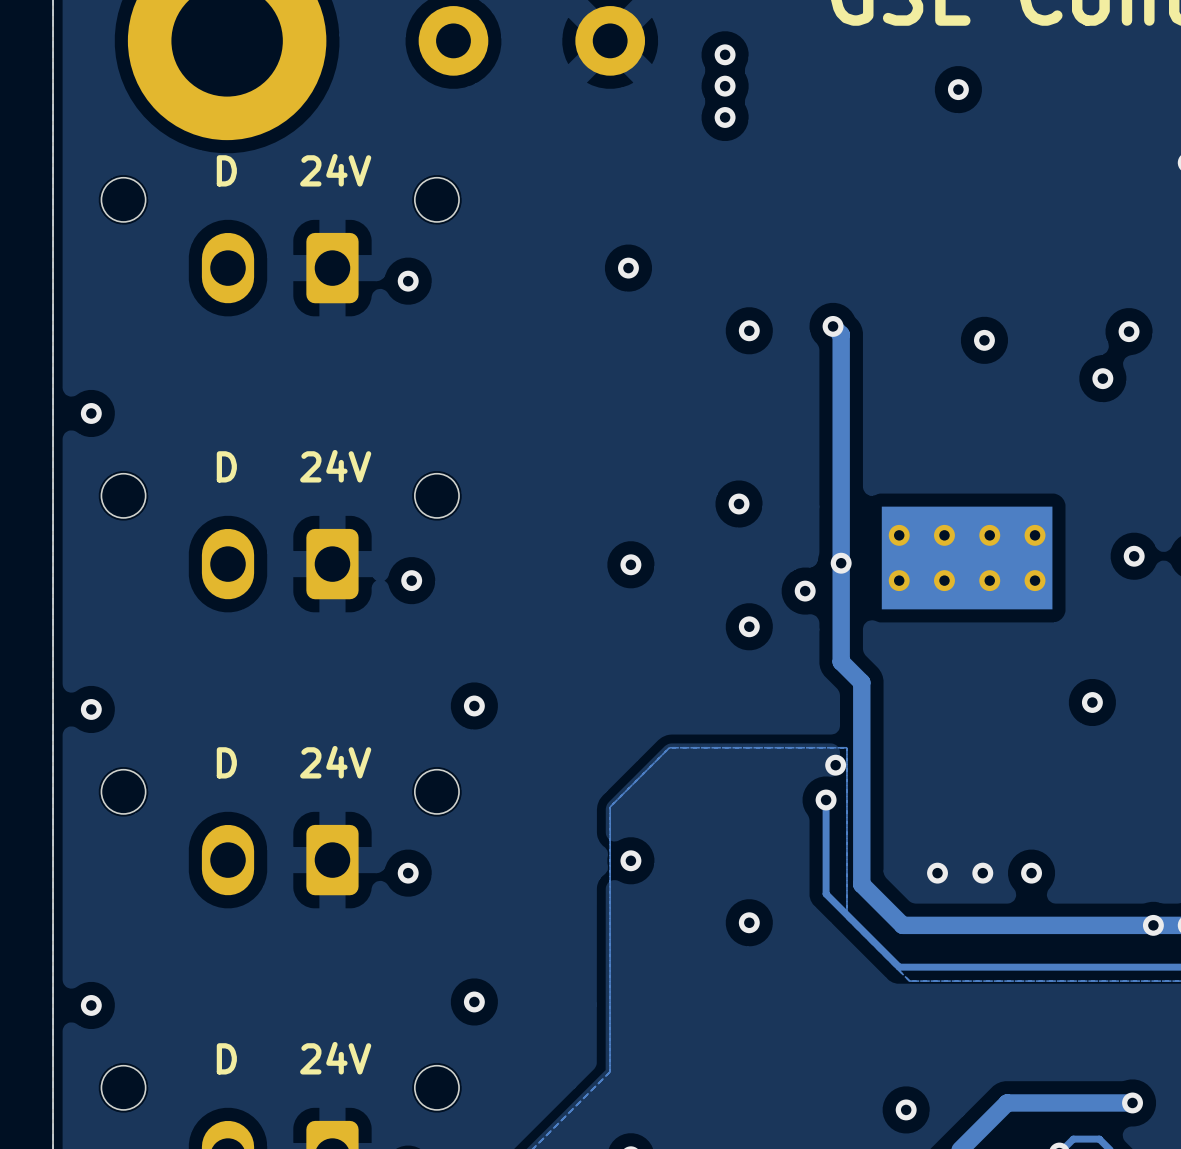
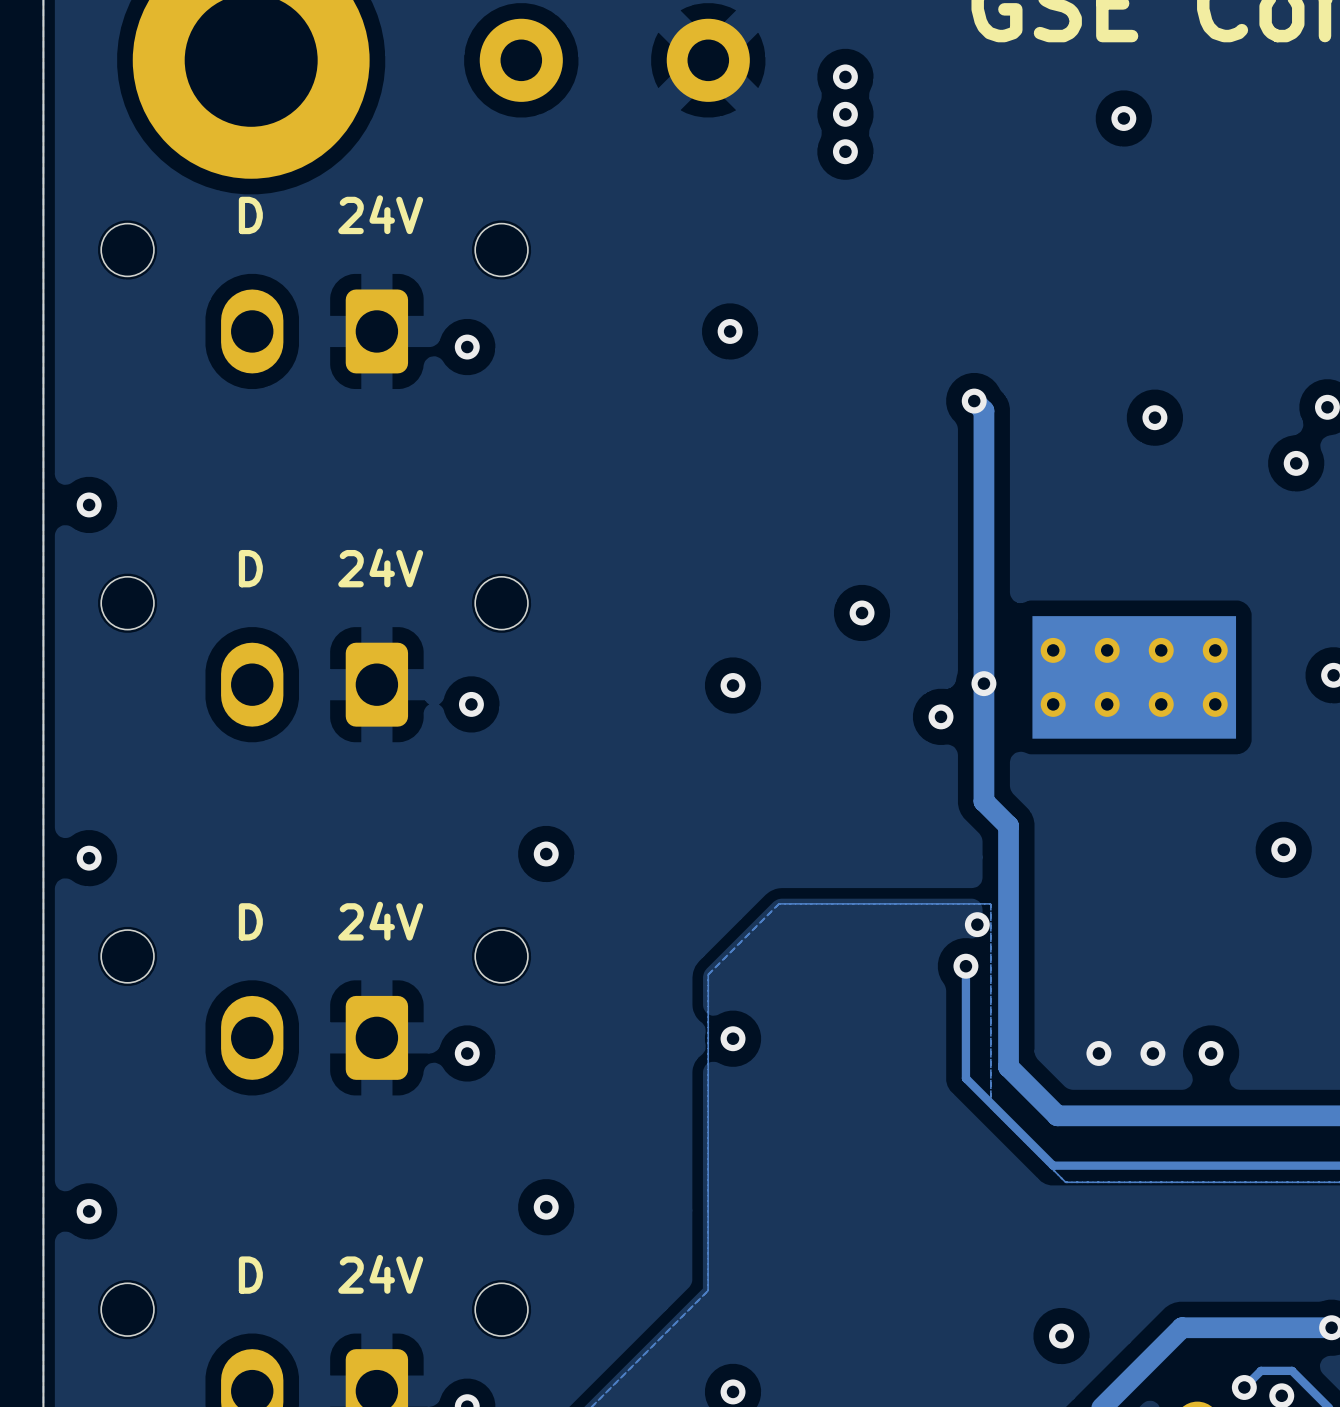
via: (749, 330) -> none
via: (749, 626) -> none
via: (749, 922) -> none

